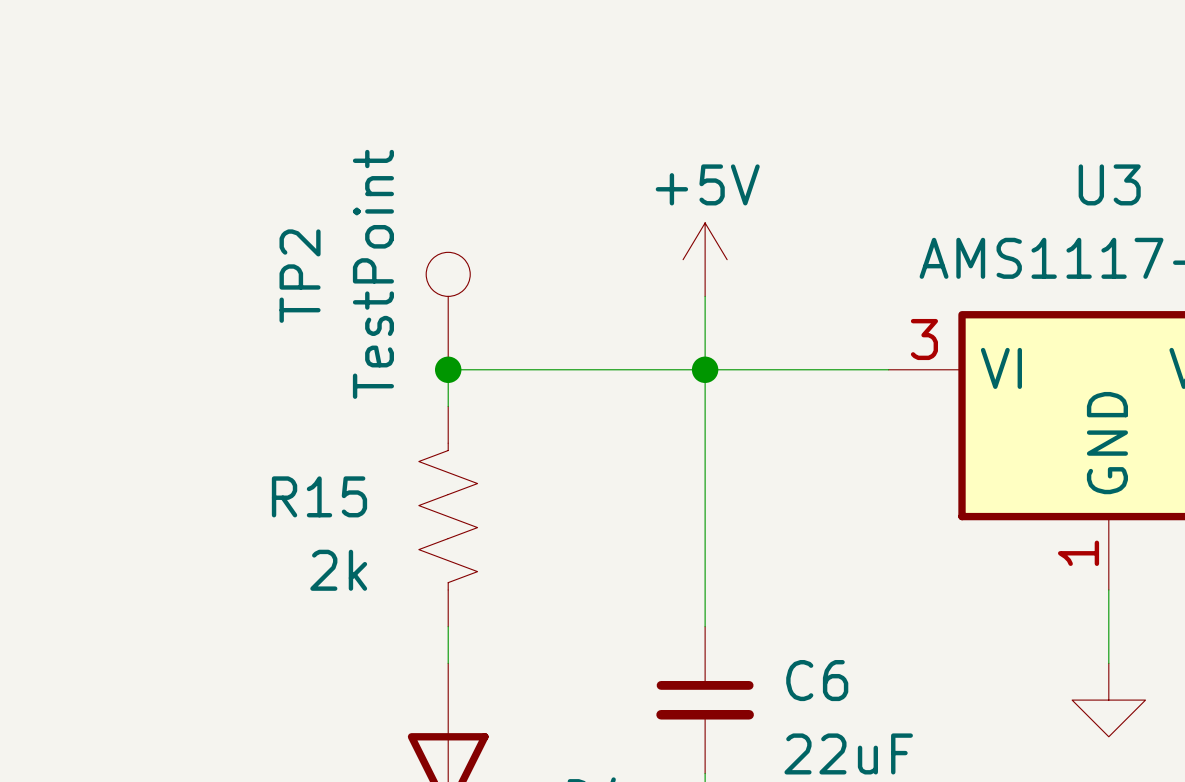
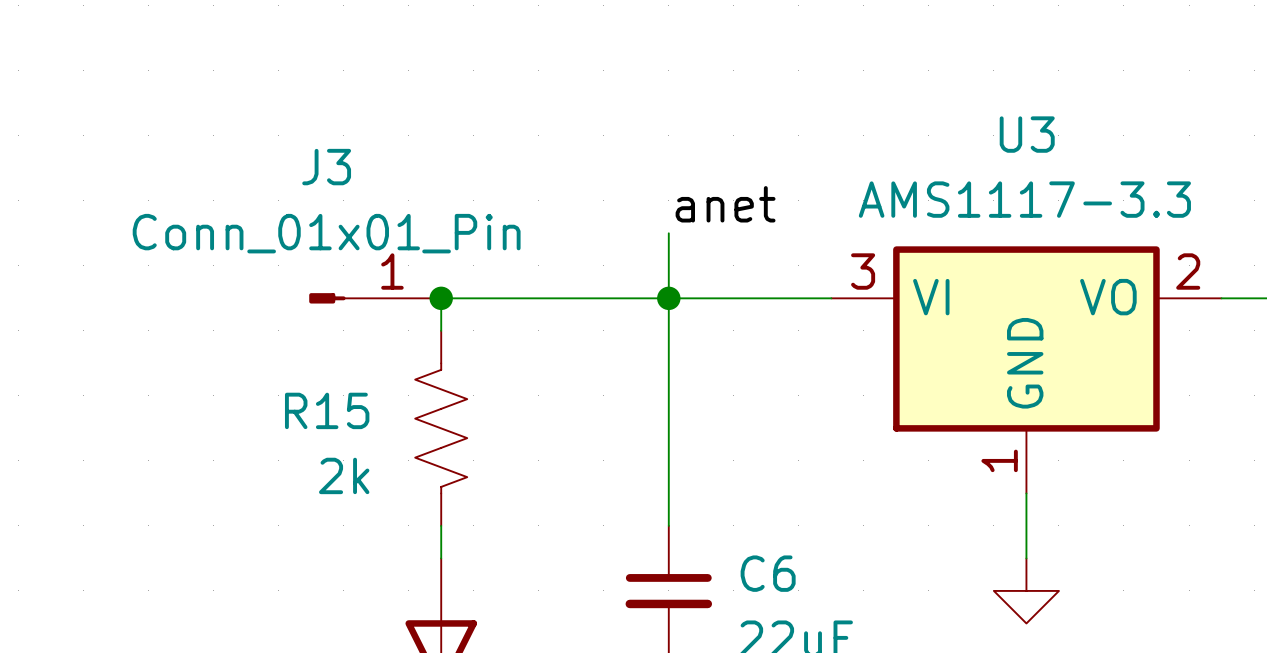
power symbol: +5V (705, 259) -> none
label: none -> anet (725, 204)
TP2: TestPoint (448, 311) -> none
J3: none -> Conn_01x01_Pin (375, 298)

